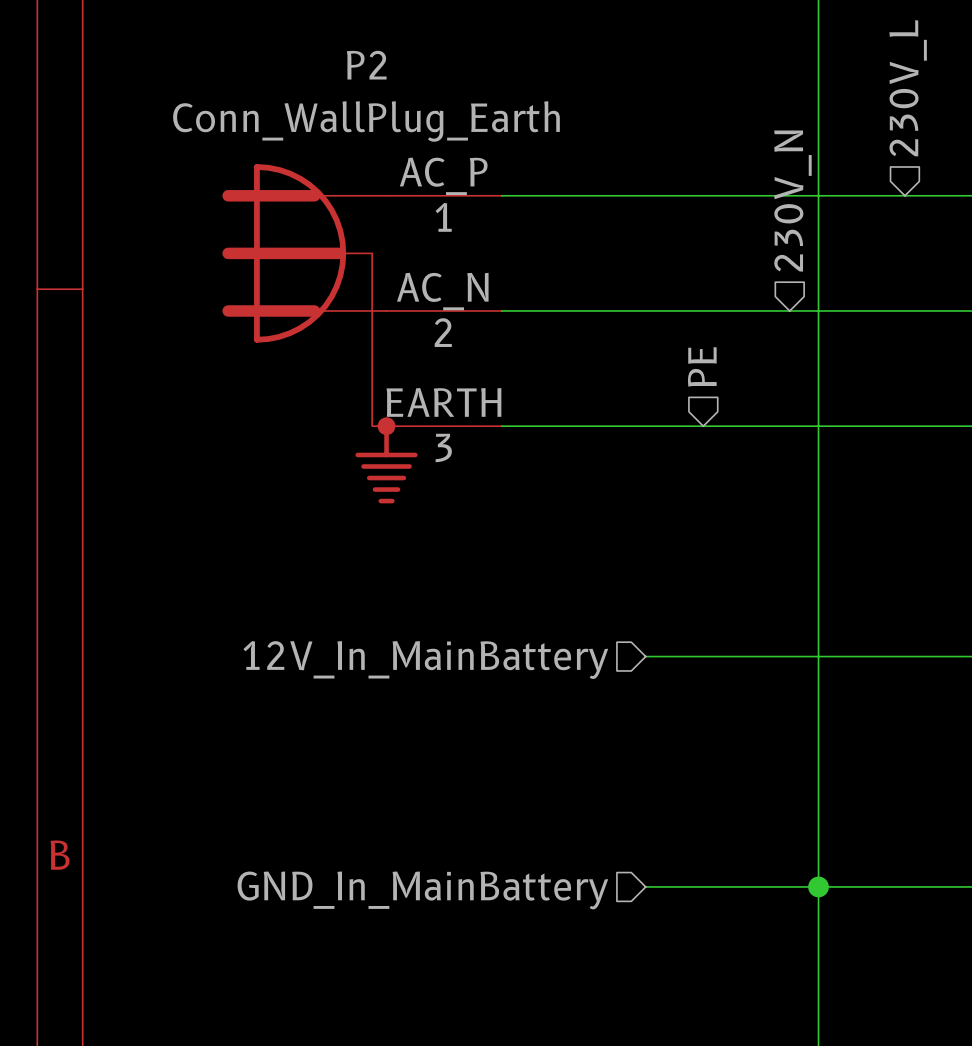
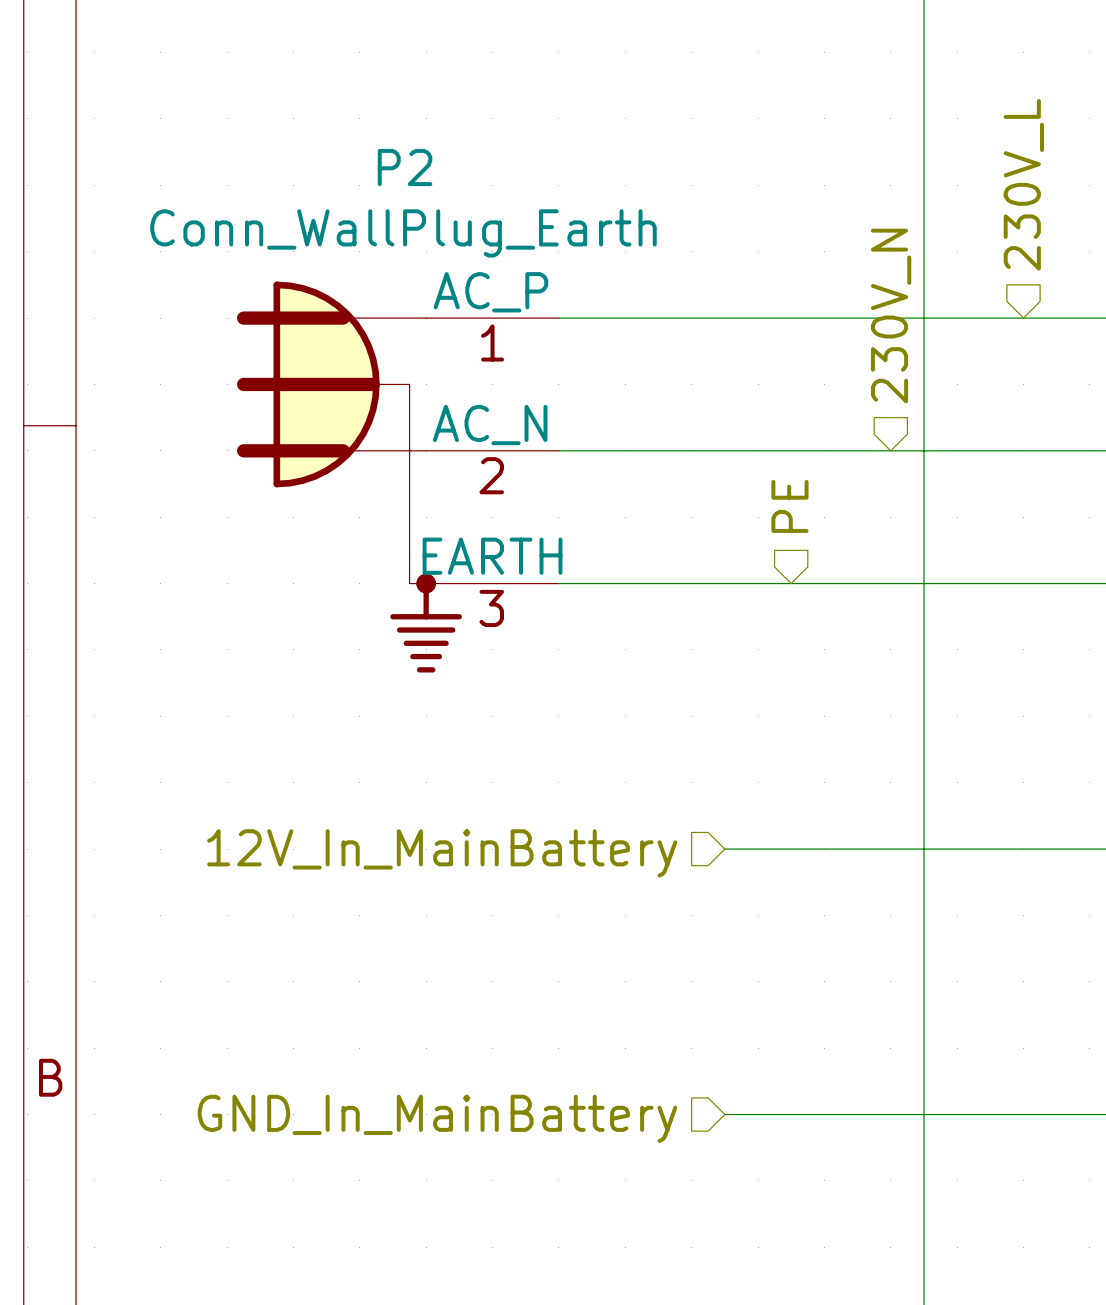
junction: (818, 886) -> none

